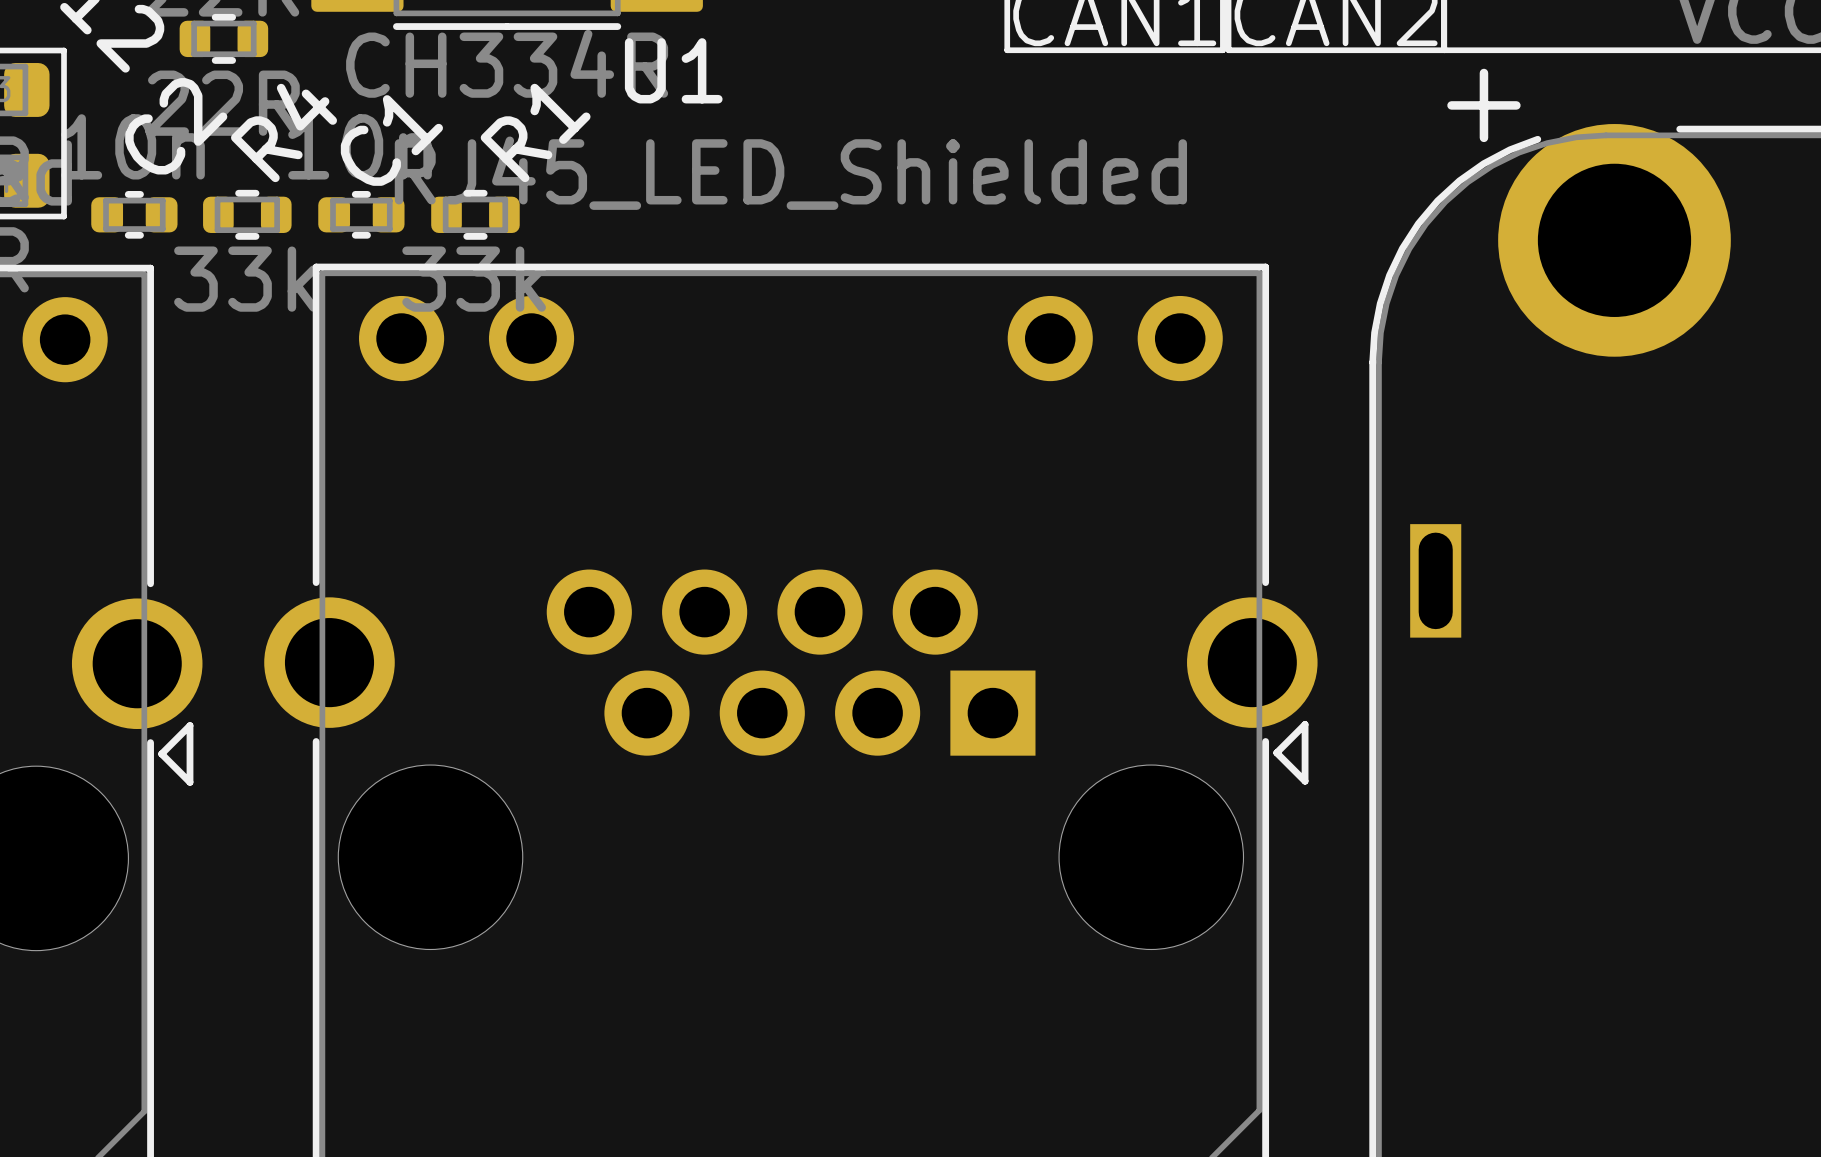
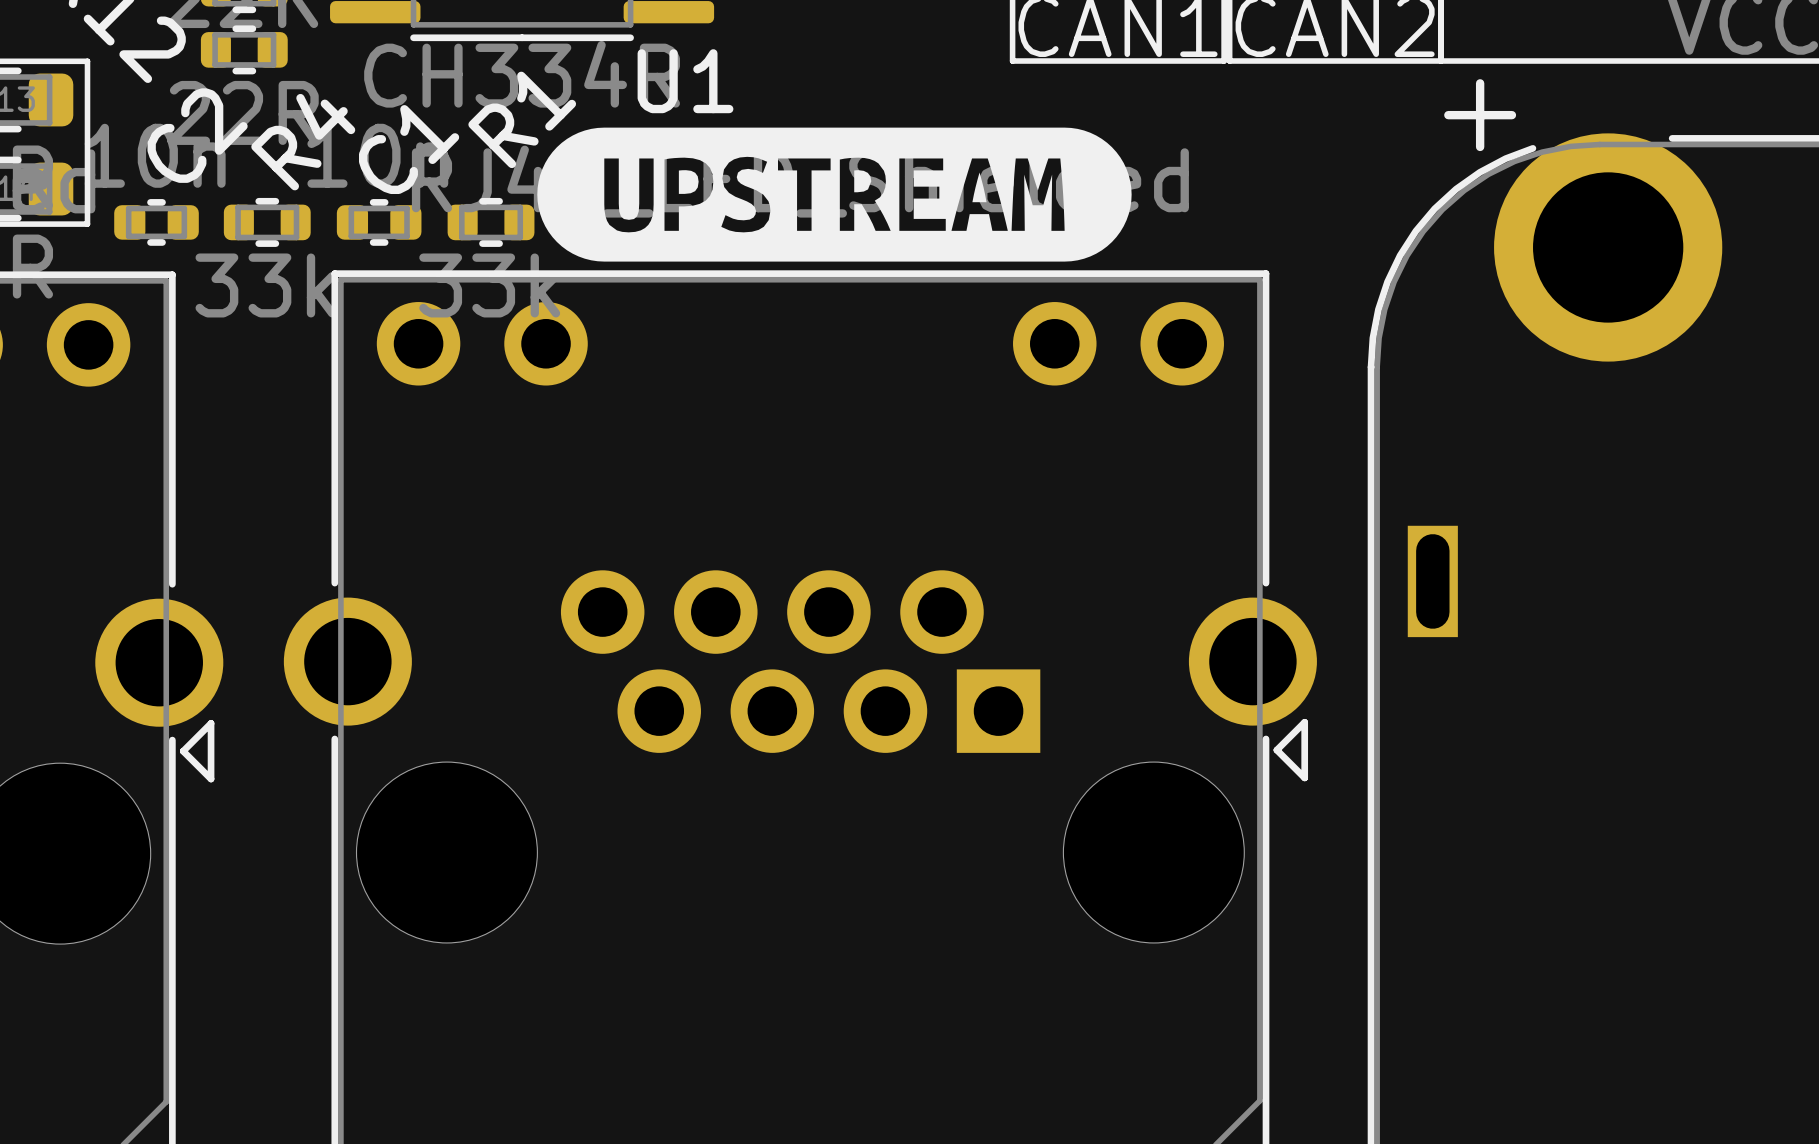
drawing: none -> [537, 127, 1132, 262]
R1 name position: R1 (535, 132) -> R1 (522, 119)

